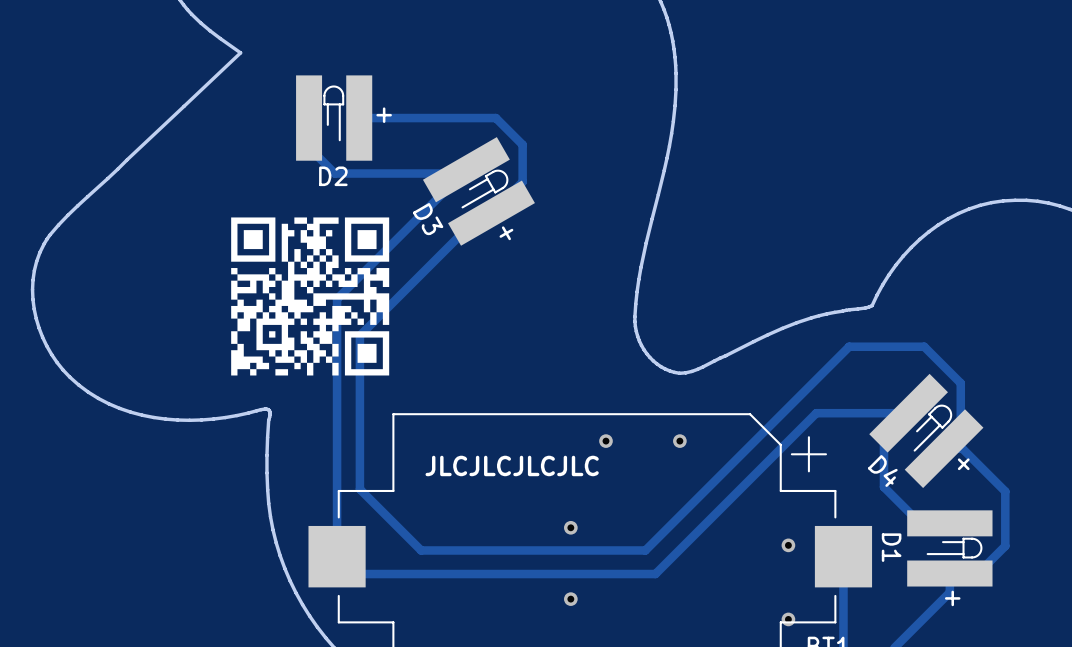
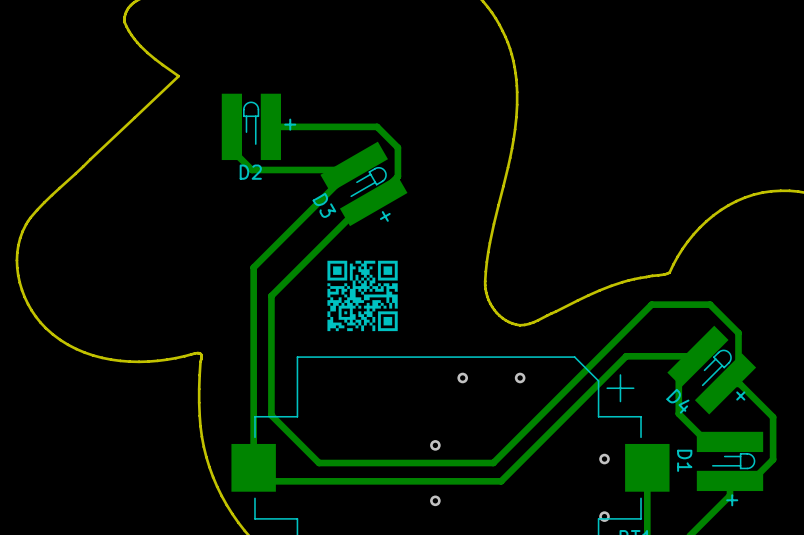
drawing: [231, 217, 390, 376] -> none
drawing: none -> [327, 260, 398, 332]
text: JLCJLCJLCJLC (512, 465) -> none

